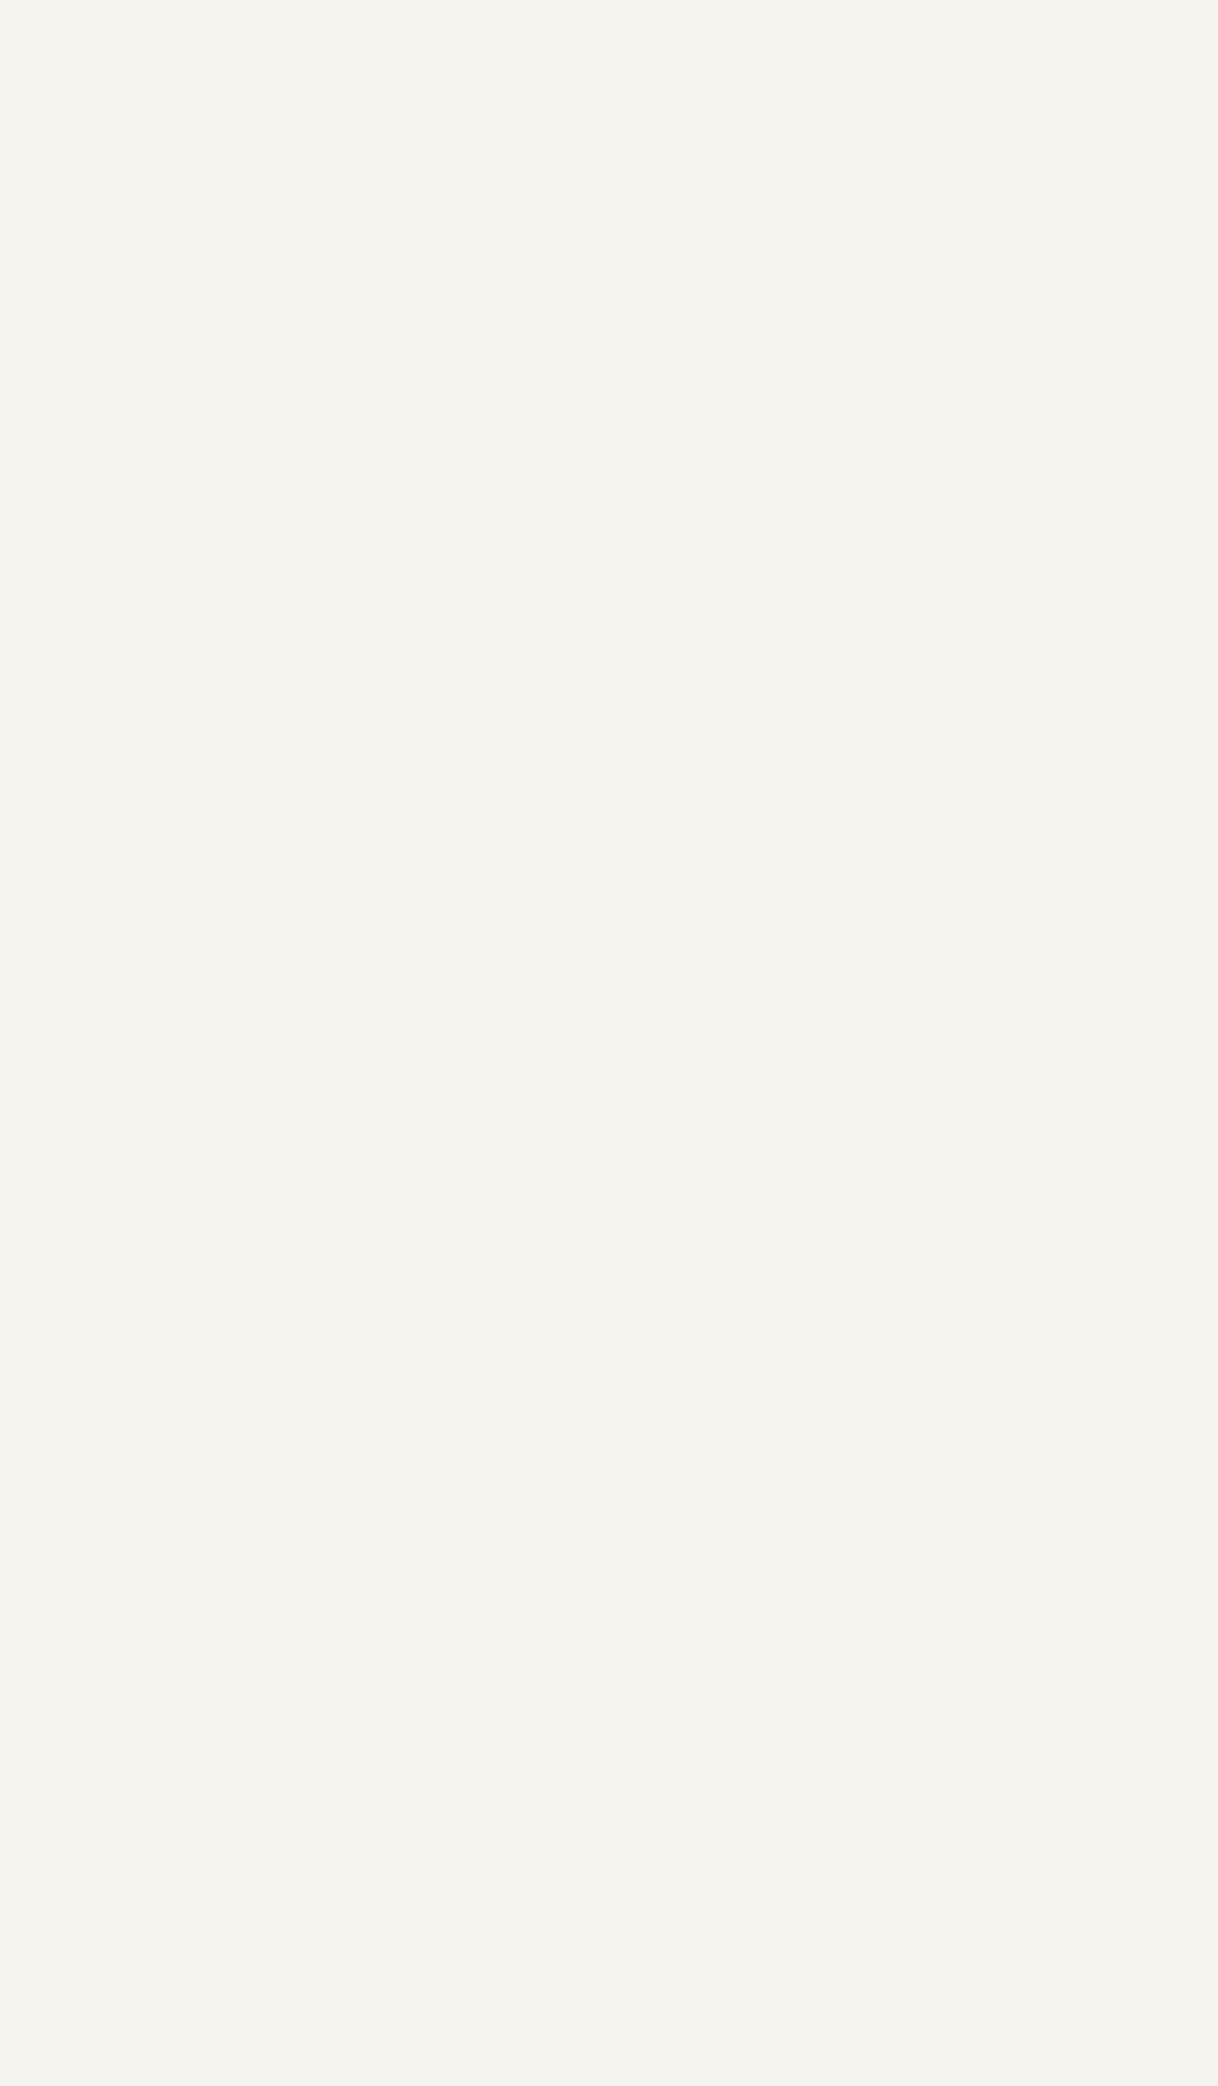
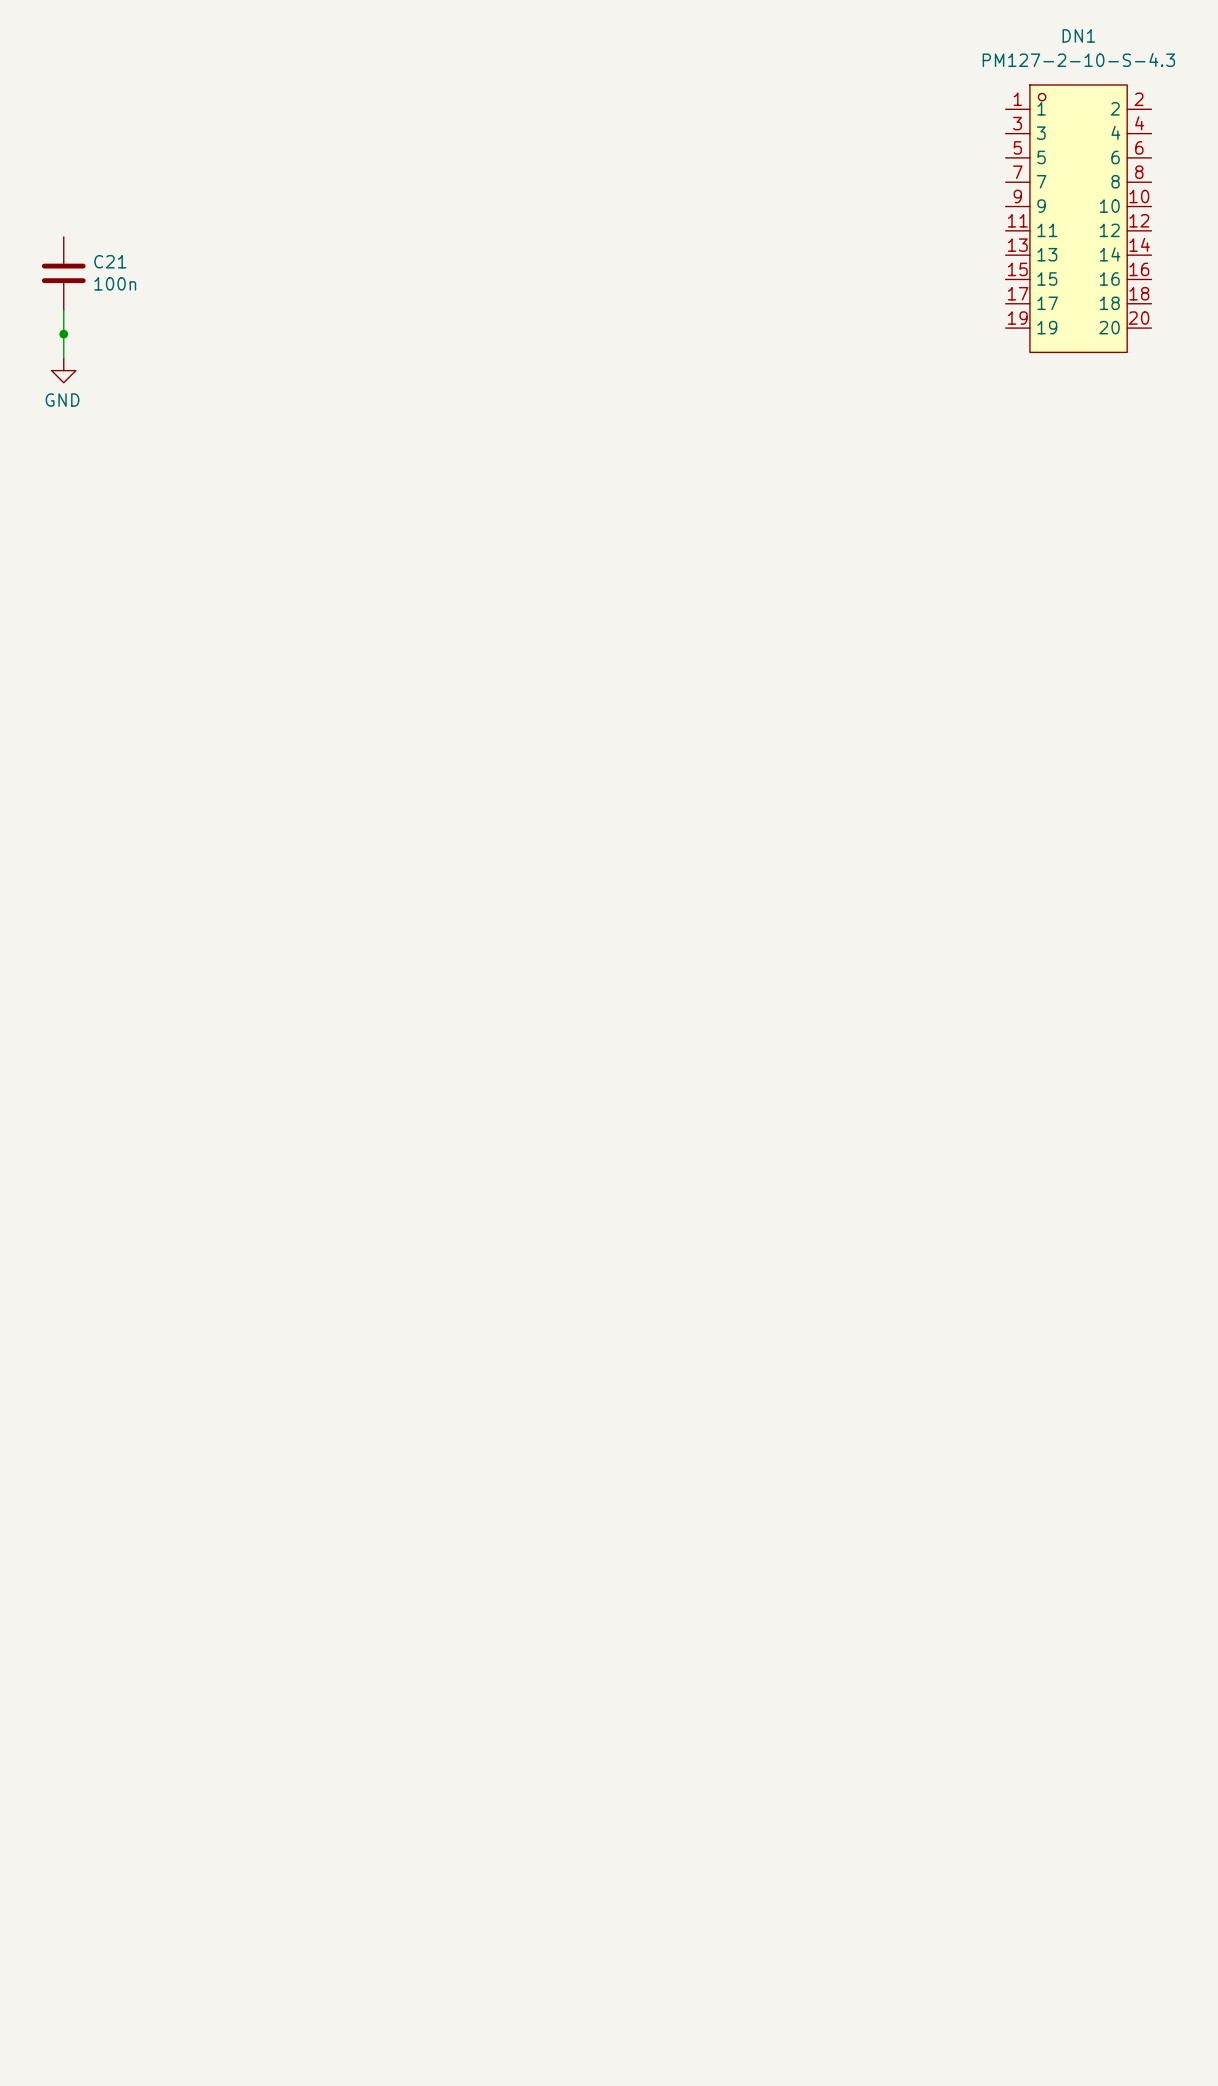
DN1: none -> PM127-2-10-S-4.3 (1078, 218)
C21: none -> 100n (63, 273)
wire: none -> (63, 309) (63, 358)
junction: none -> (63, 334)
power symbol: none -> GND (63, 370)

